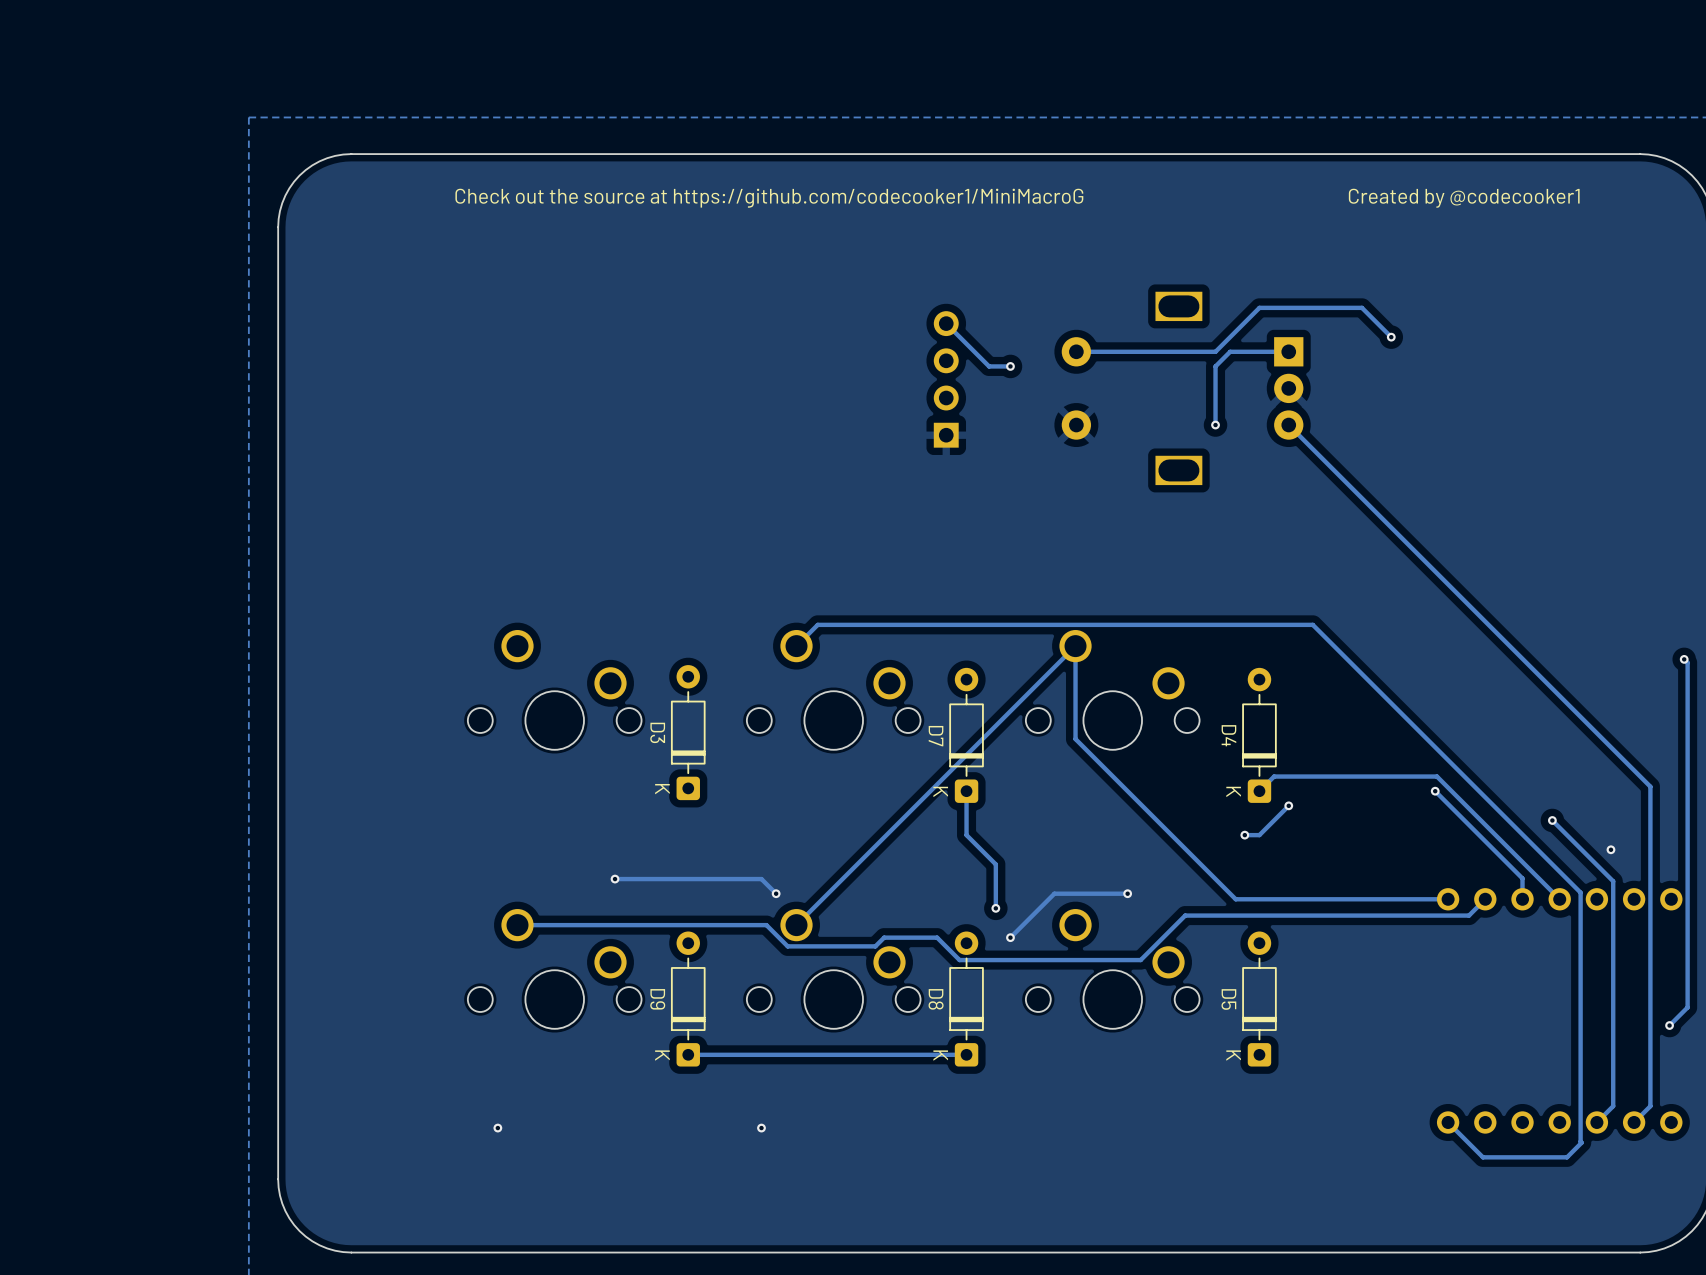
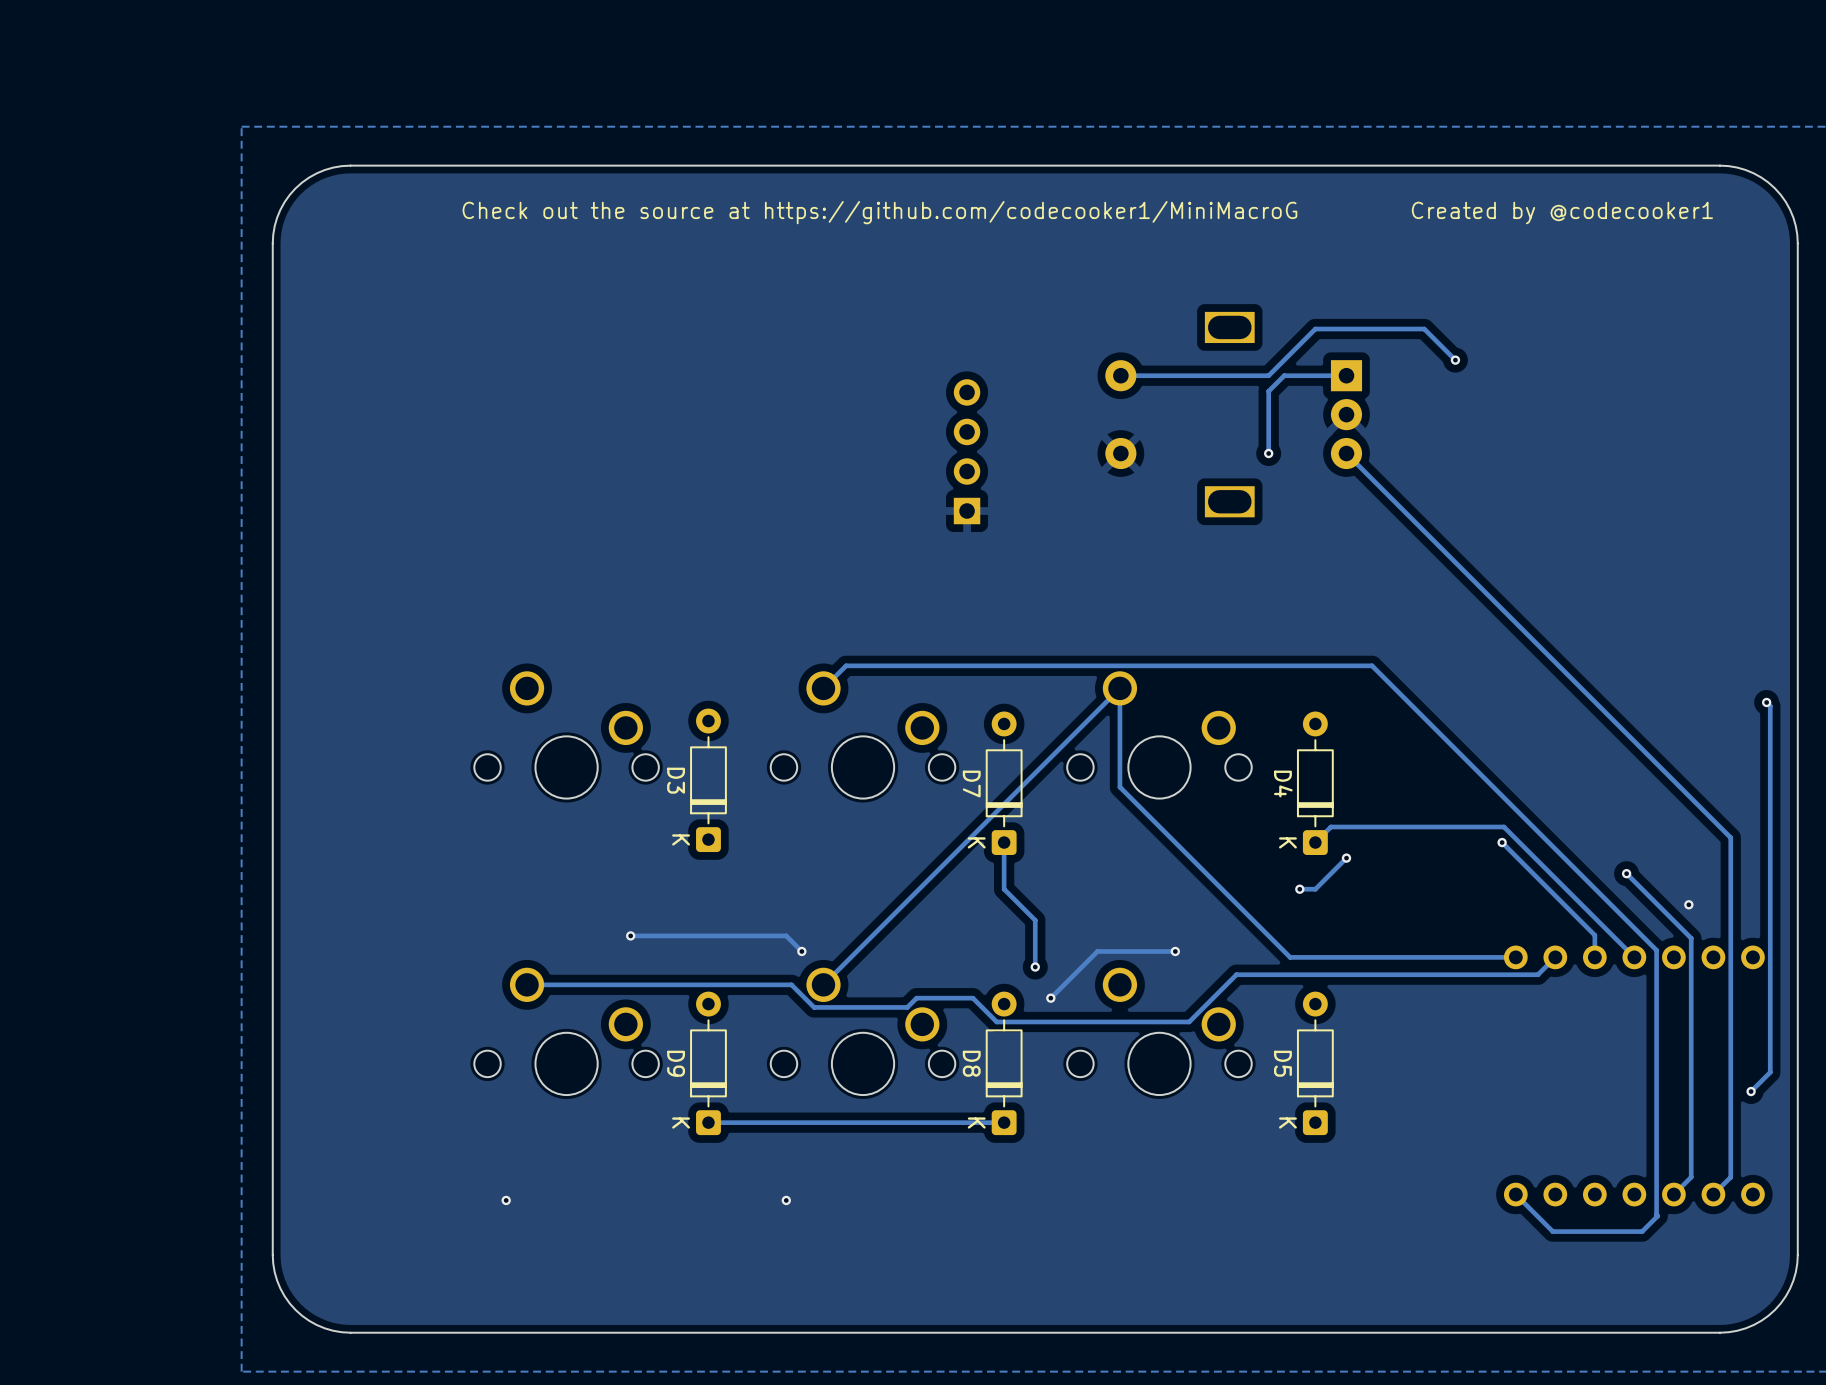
track: (946, 323) (989, 366) (1010, 366) -> none
via: (1010, 366) -> none
part position: (946, 379) -> (967, 451)

